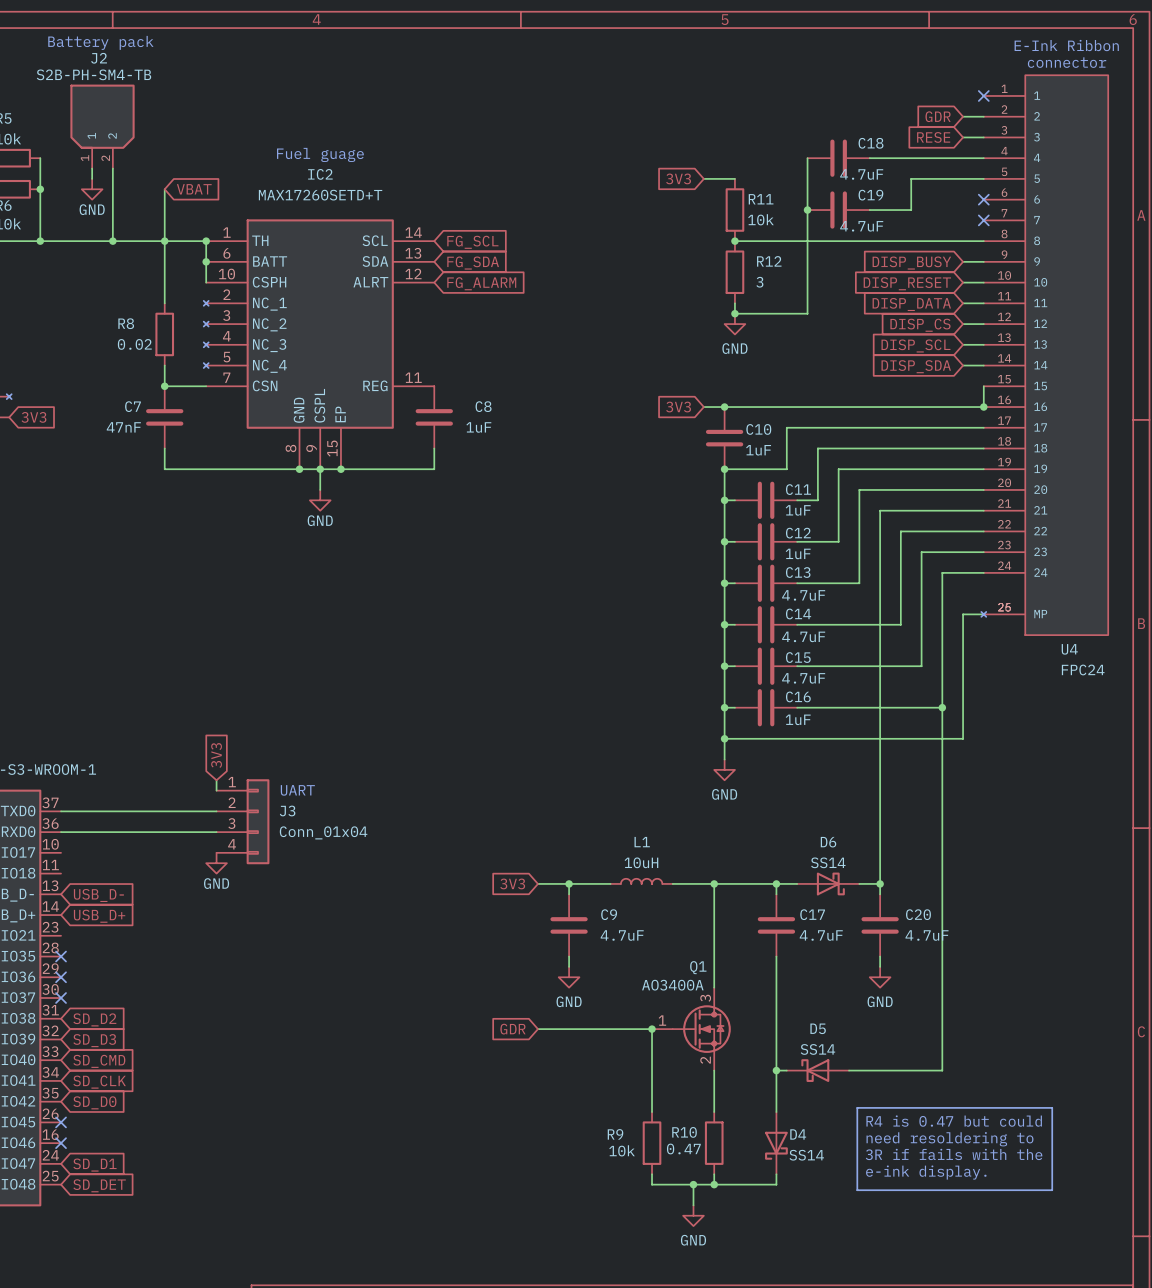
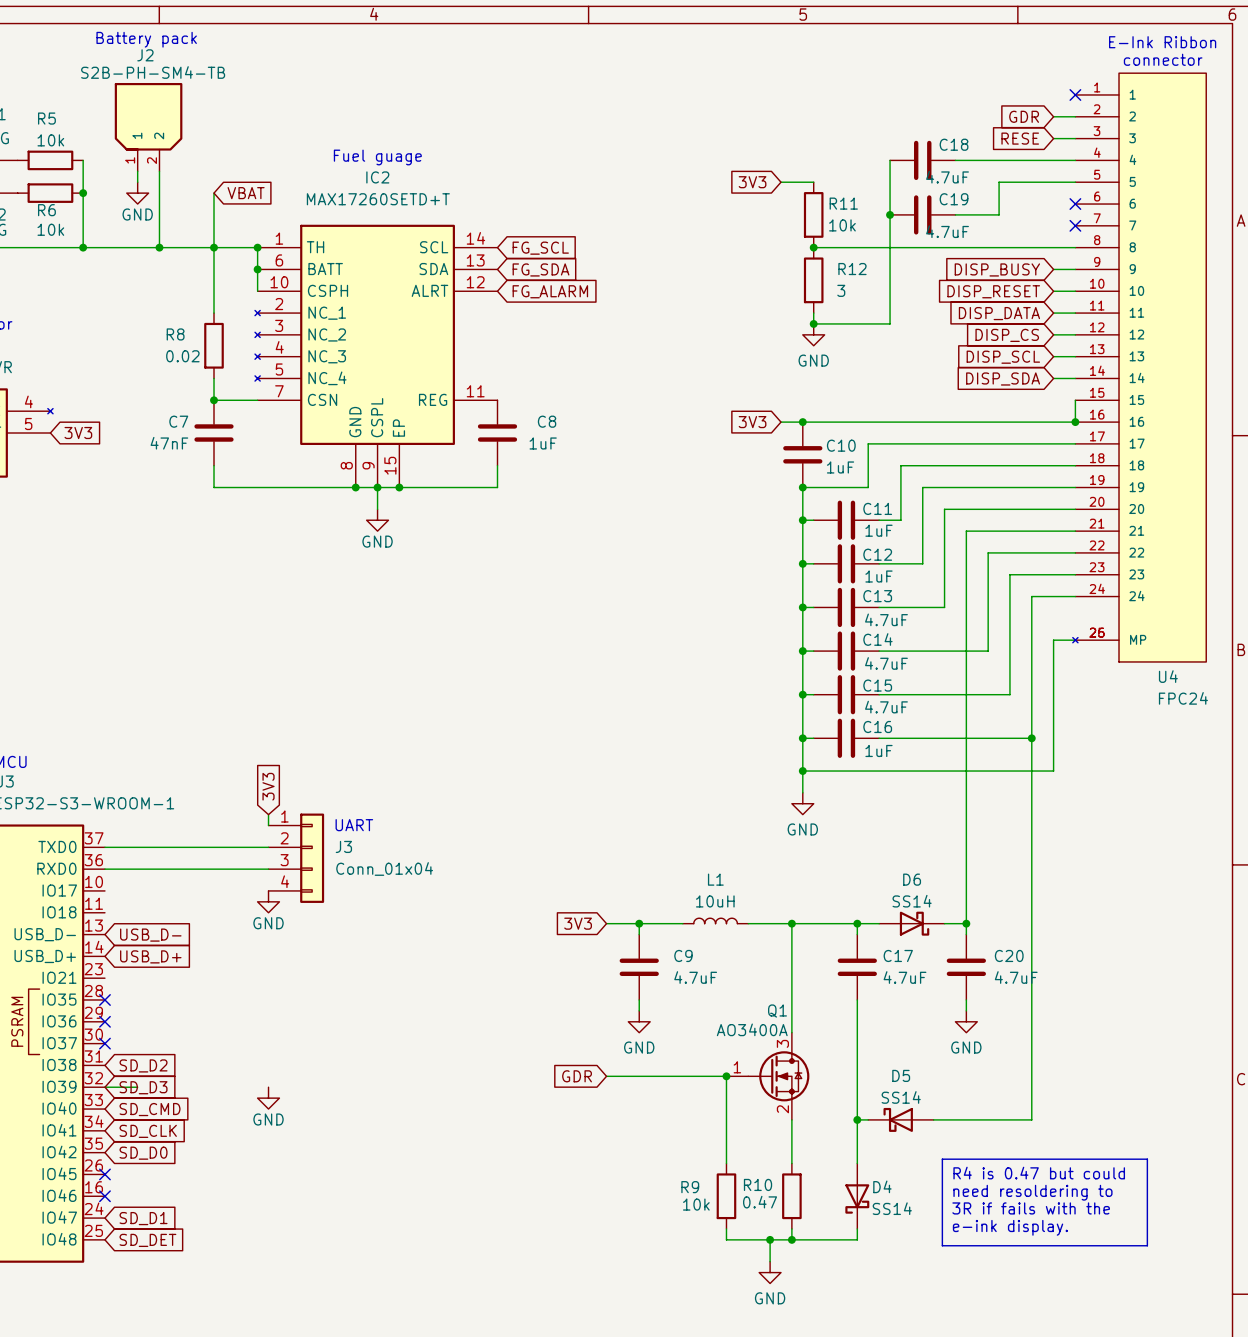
wire: none -> (104, 1087) (137, 1087)
power symbol: none -> GND (268, 1098)

